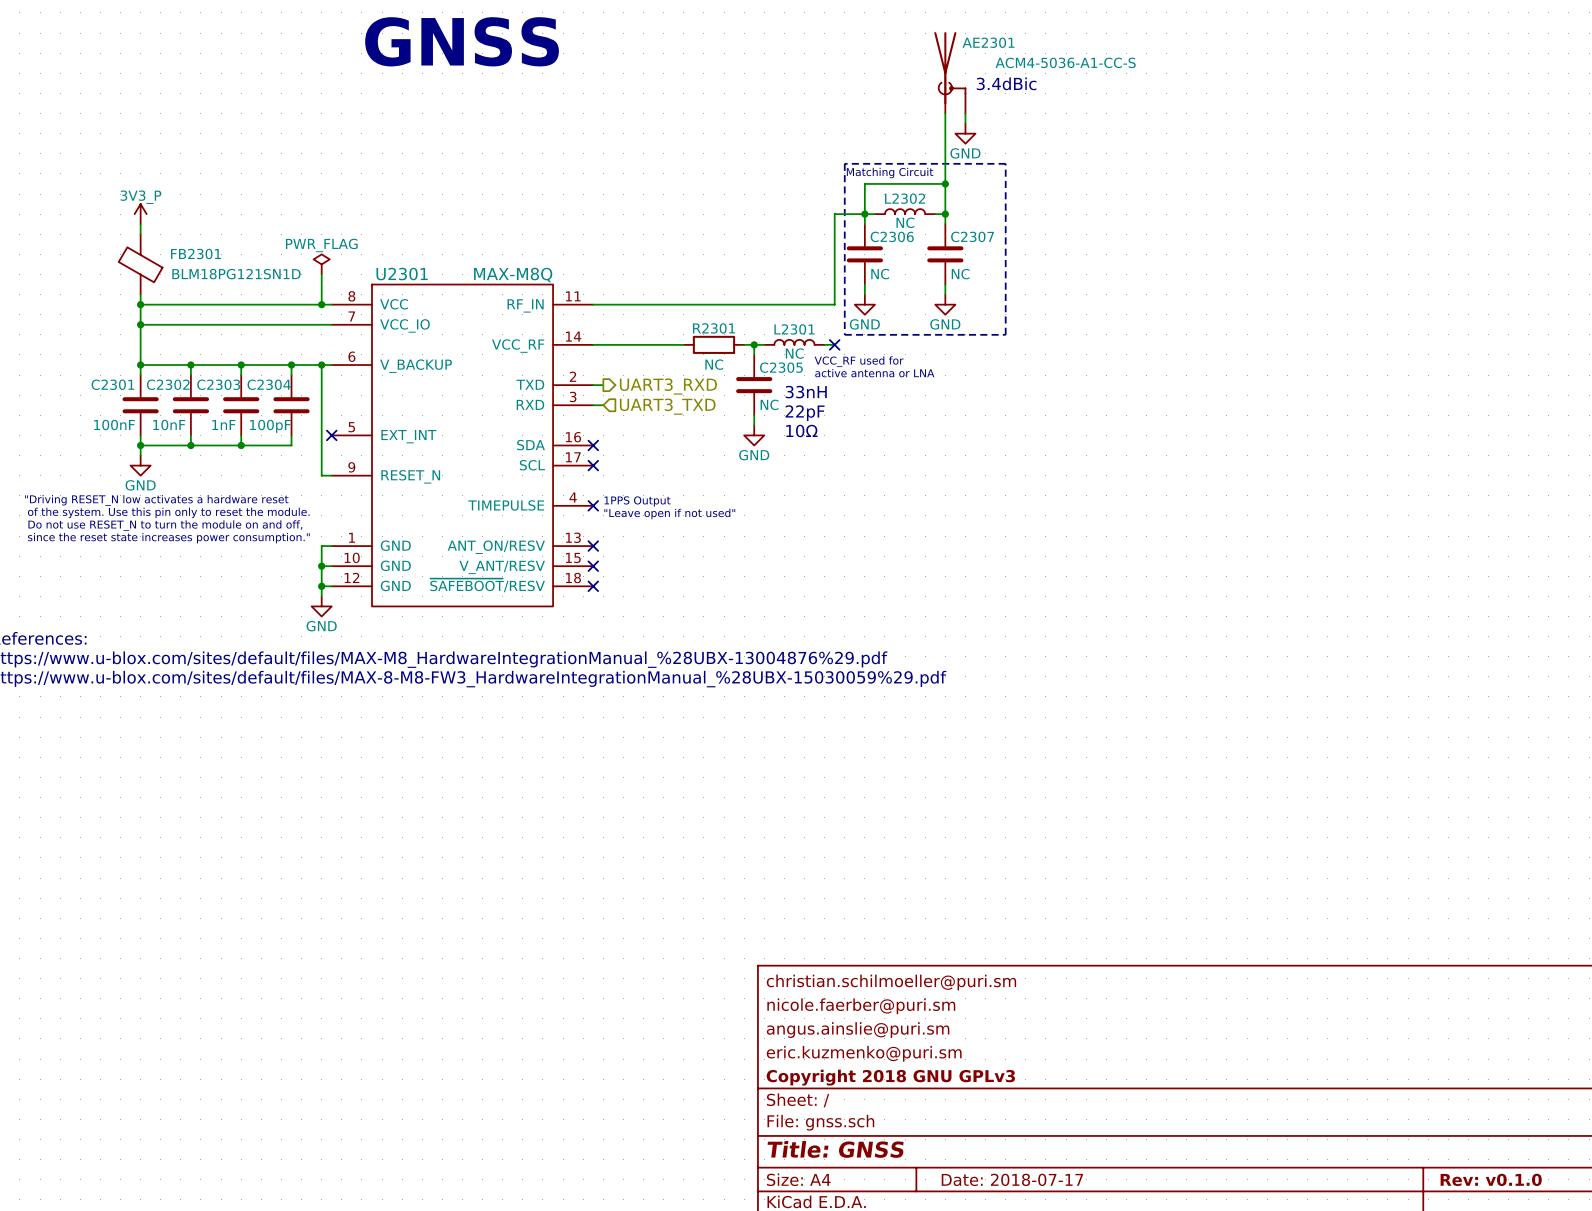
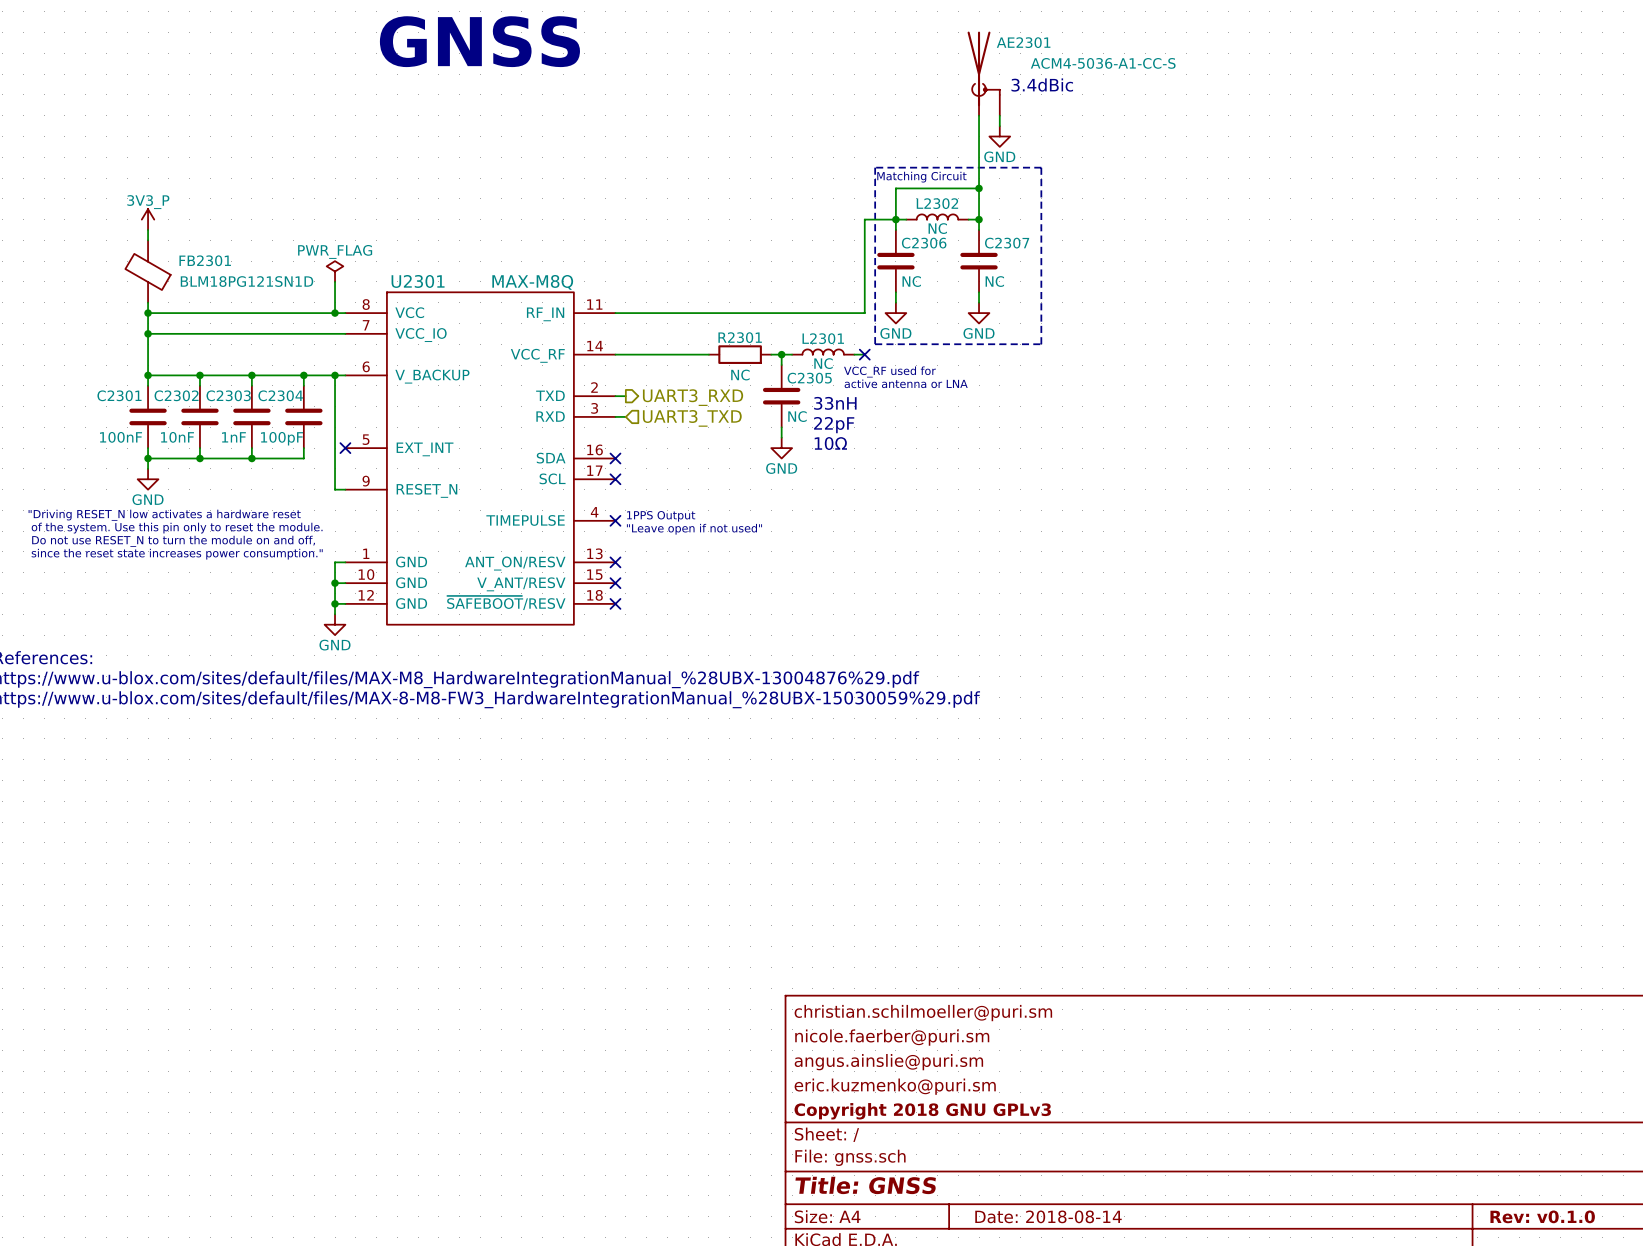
title block: Date: 2018-07-17 (1012, 1179) -> Date: 2018-08-14 (1048, 1216)

